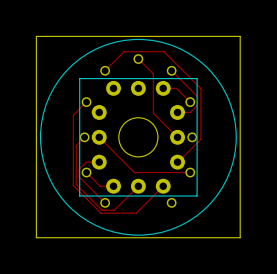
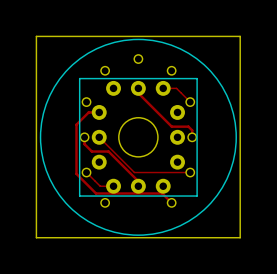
track: (138, 59) (153, 73) (153, 113) (177, 137) -> none
track: (105, 70) (124, 51) (164, 51) (200, 88) (200, 139) (177, 162) -> none
track: (171, 70) (197, 96) (197, 105) (190, 112) (177, 112) -> none
track: none -> (138, 93) (171, 126) (188, 126) (192, 130) (192, 137)
track: (86, 102) (73, 115) (73, 185) (100, 213) (136, 213) (163, 186) -> none
track: none -> (99, 112) (88, 112) (76, 124) (76, 173) (96, 193) (162, 193) (171, 202)
track: (84, 137) (76, 145) (76, 184) (102, 210) (114, 210) (138, 186) -> (84, 137) (84, 144) (91, 151) (108, 151) (138, 181)
track: (99, 162) (86, 162) (79, 169) (79, 176) (105, 202) -> none

